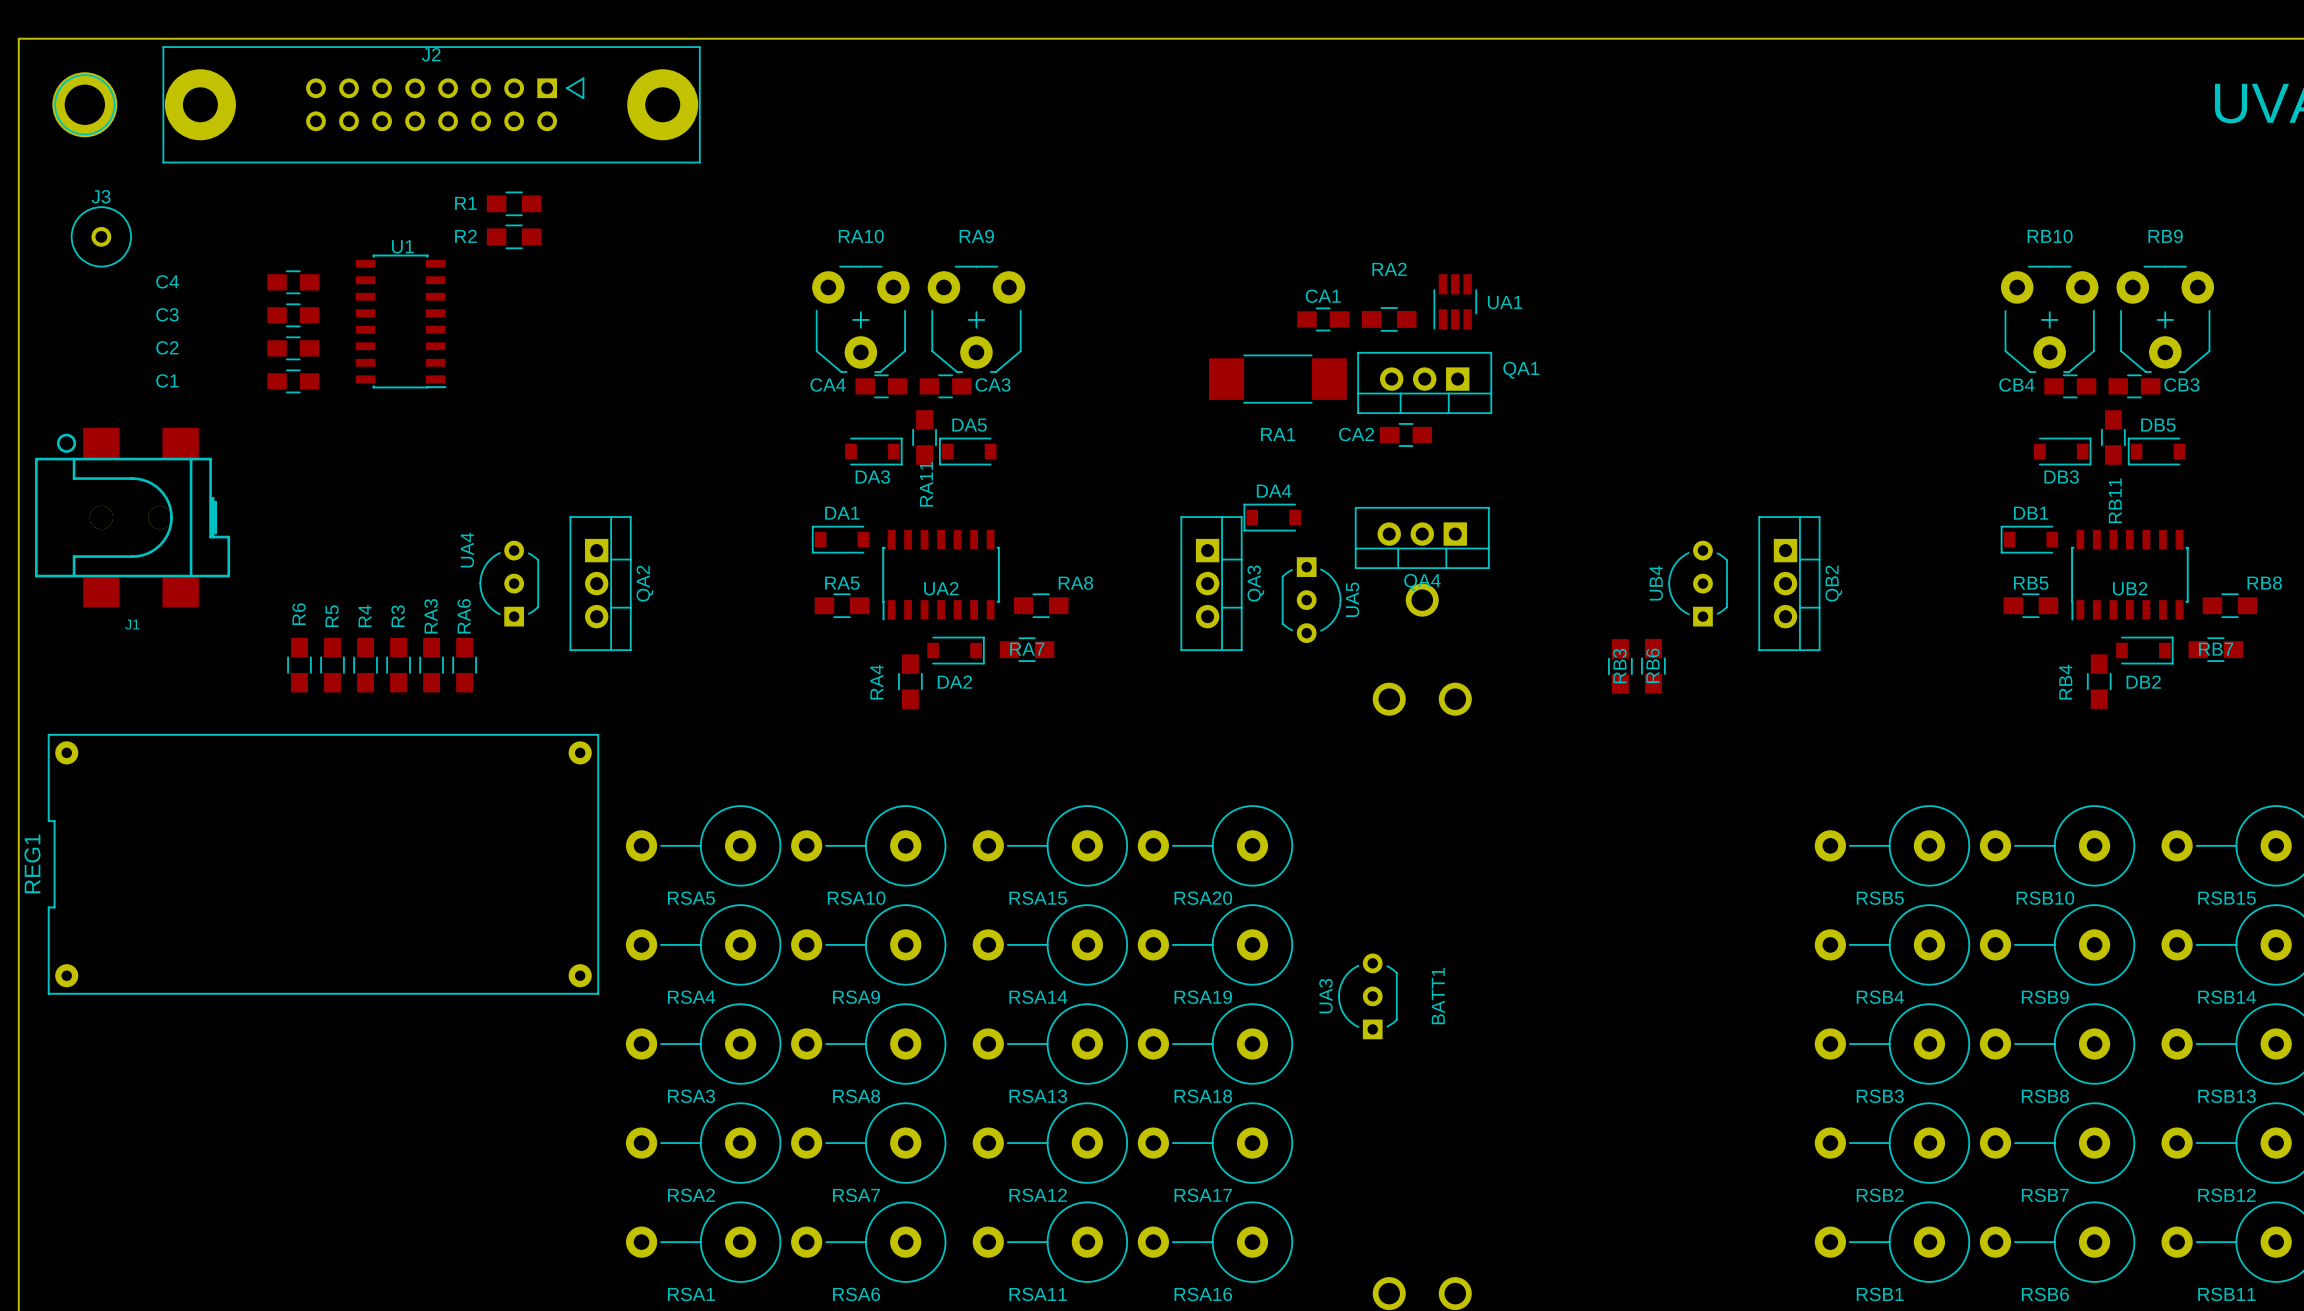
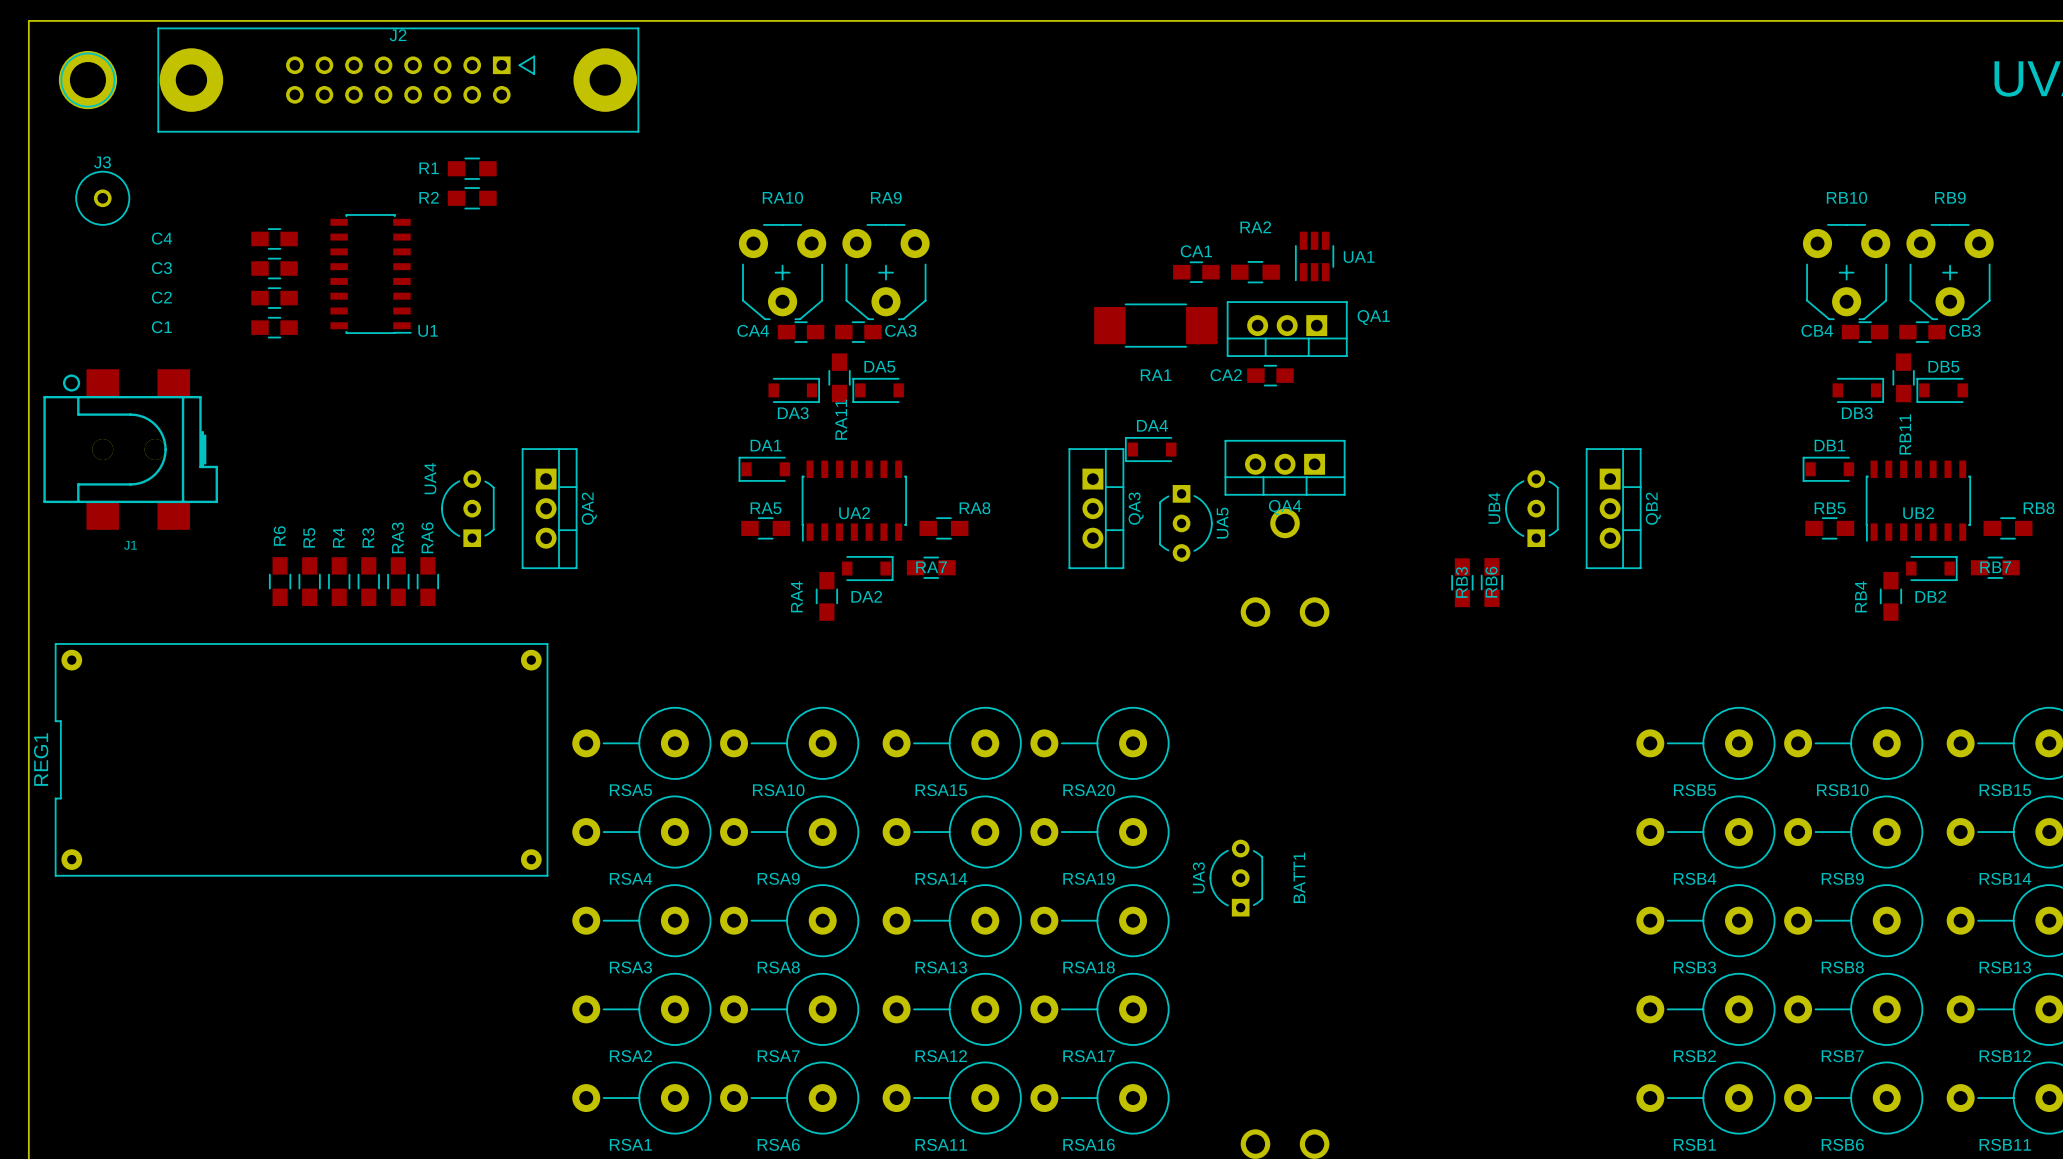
U1 name position: U1 (402, 246) -> U1 (428, 330)

